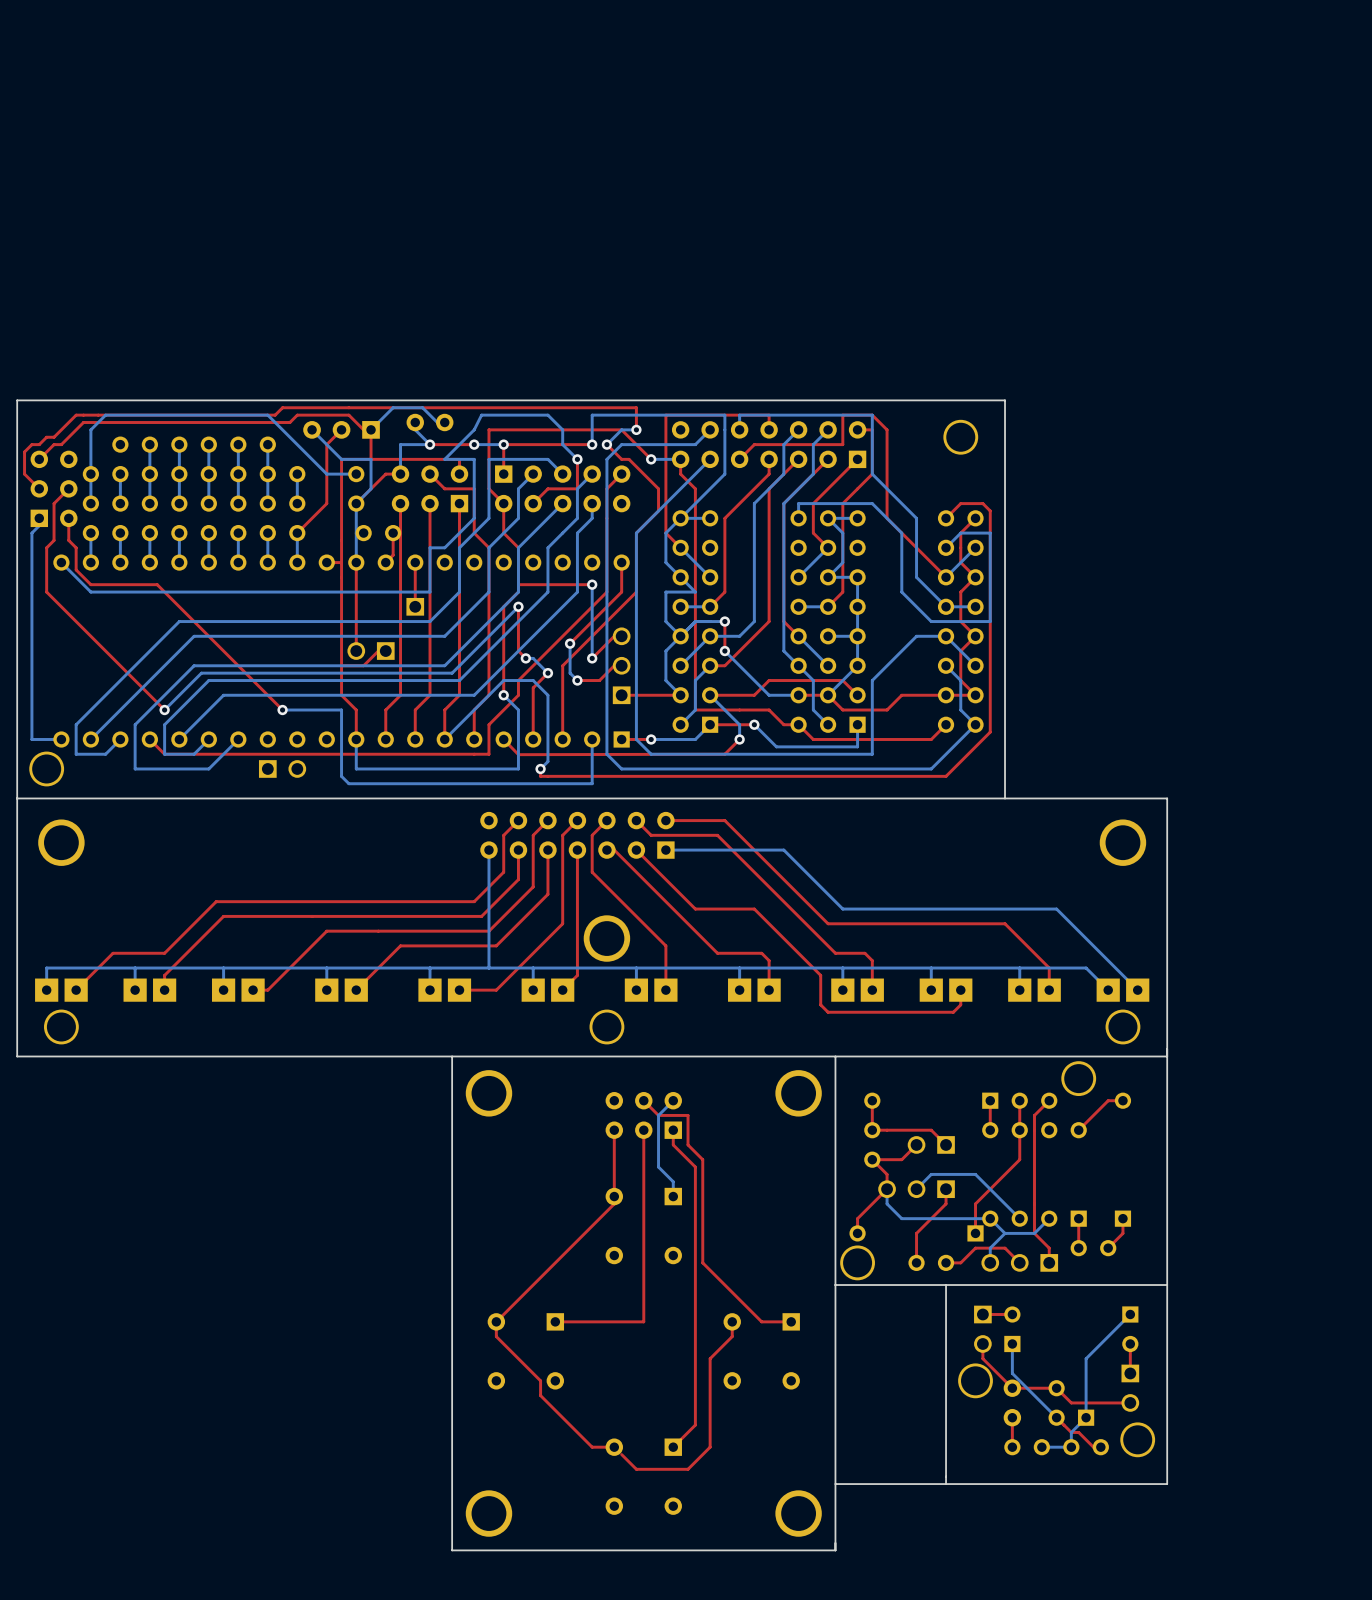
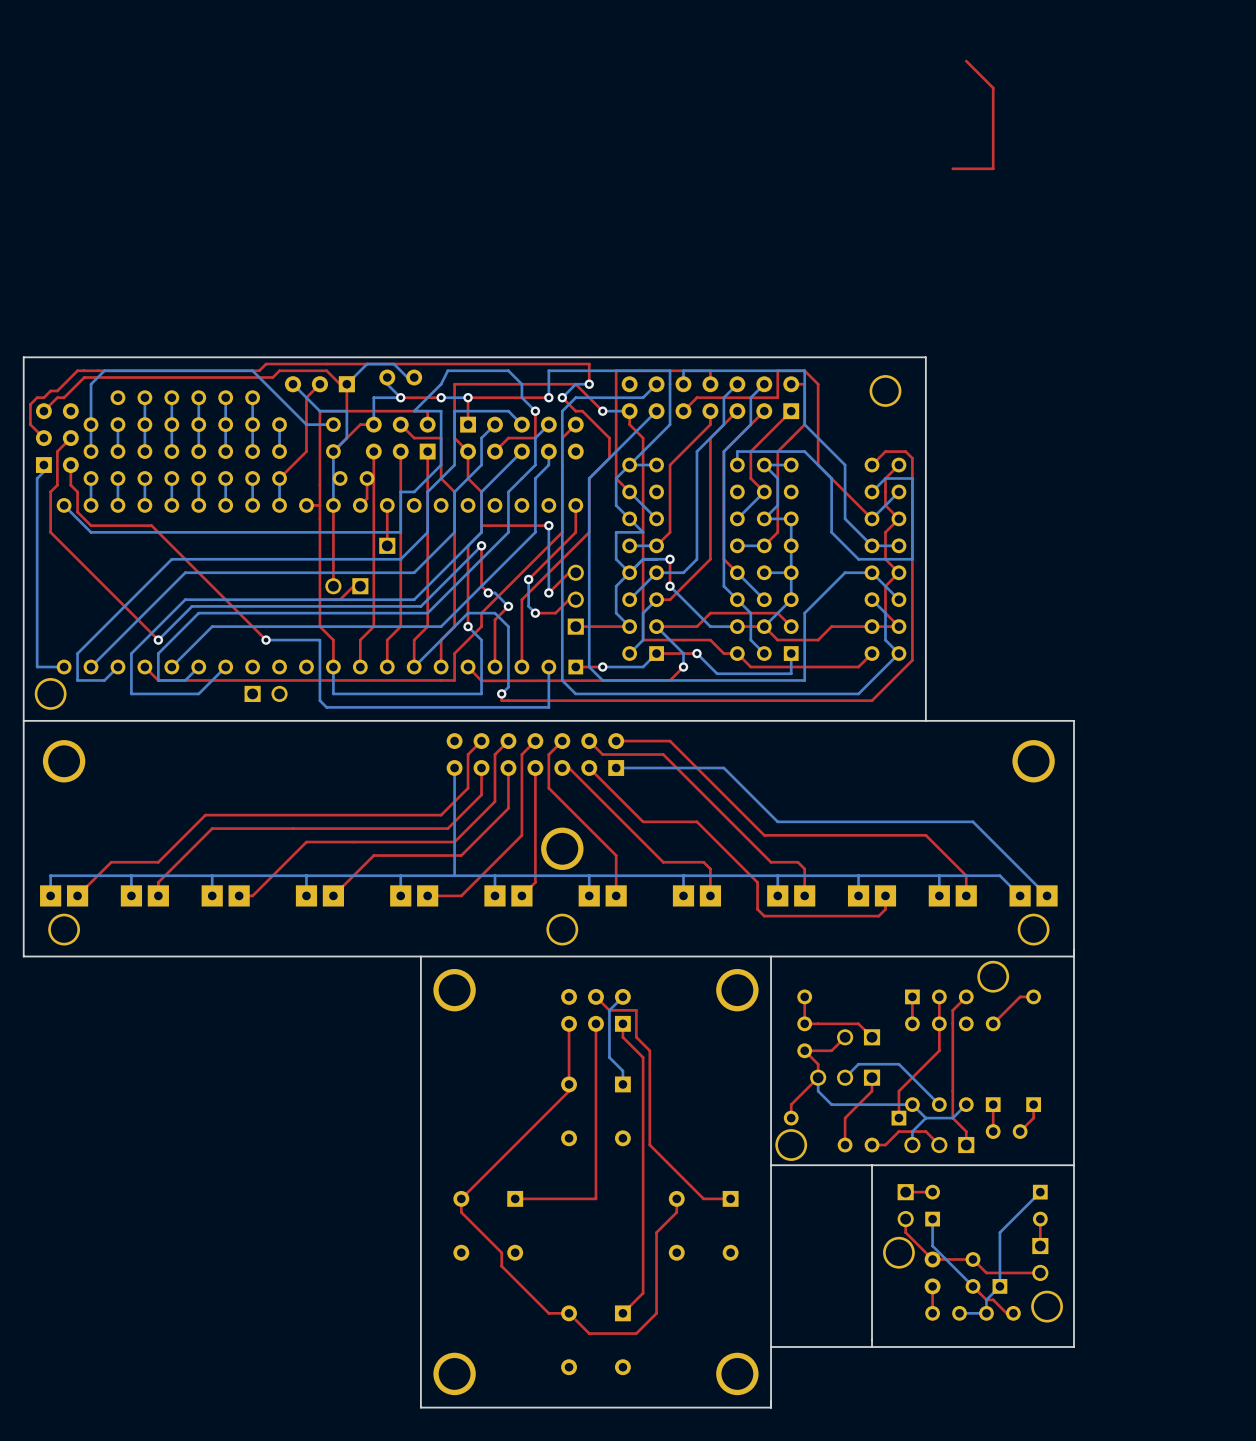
top track: none -> (966, 61) (993, 88) (993, 168) (952, 168)

